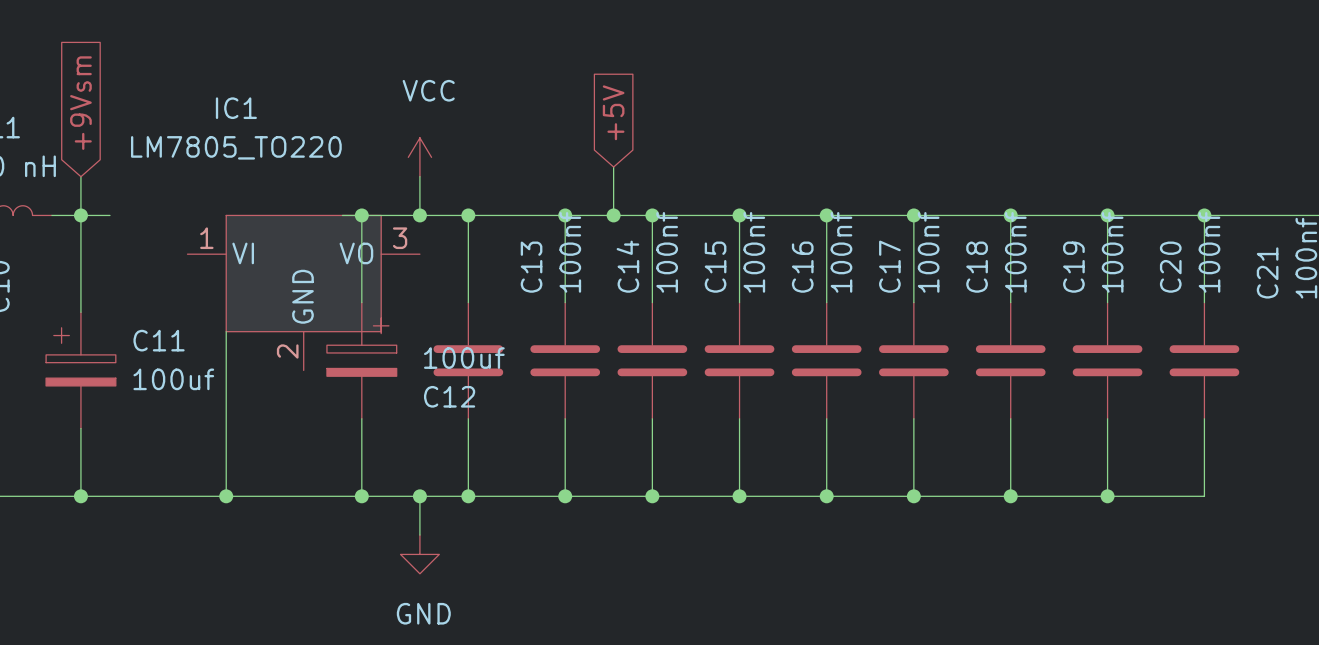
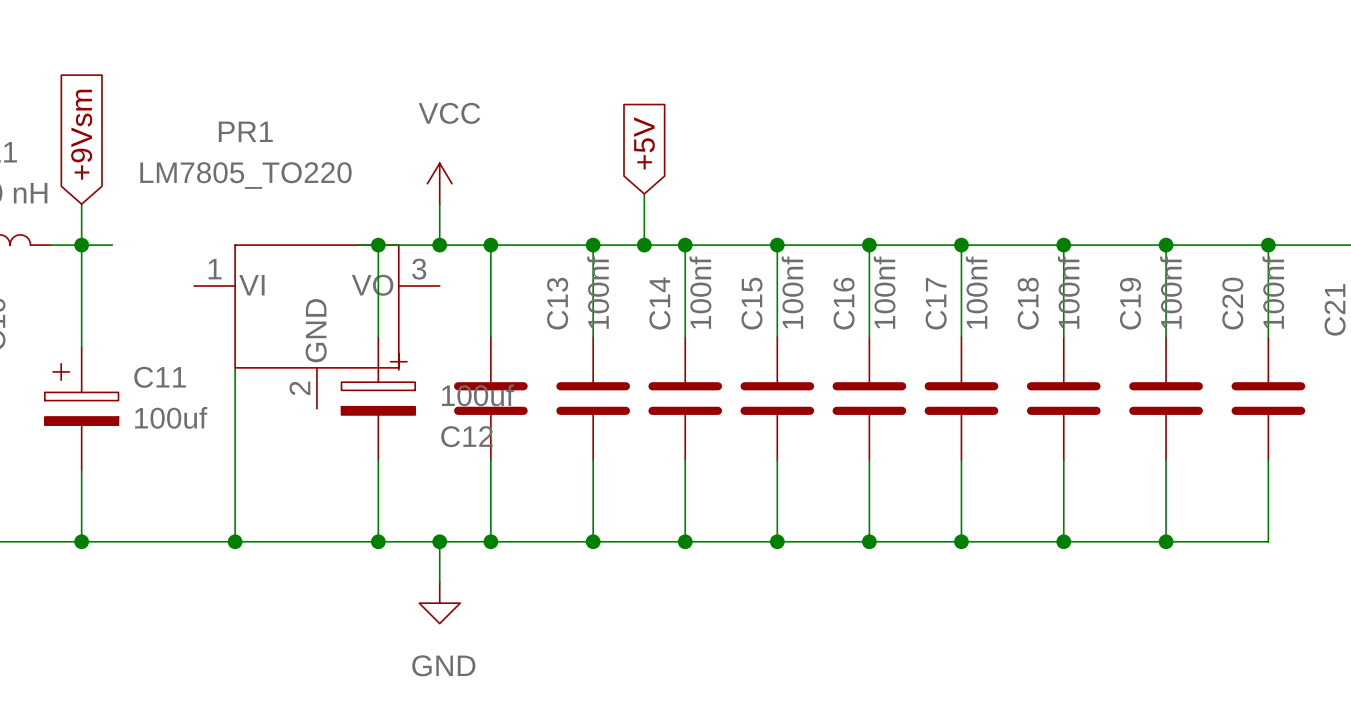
IC1 name: IC1 (236, 108) -> PR1 (245, 131)

